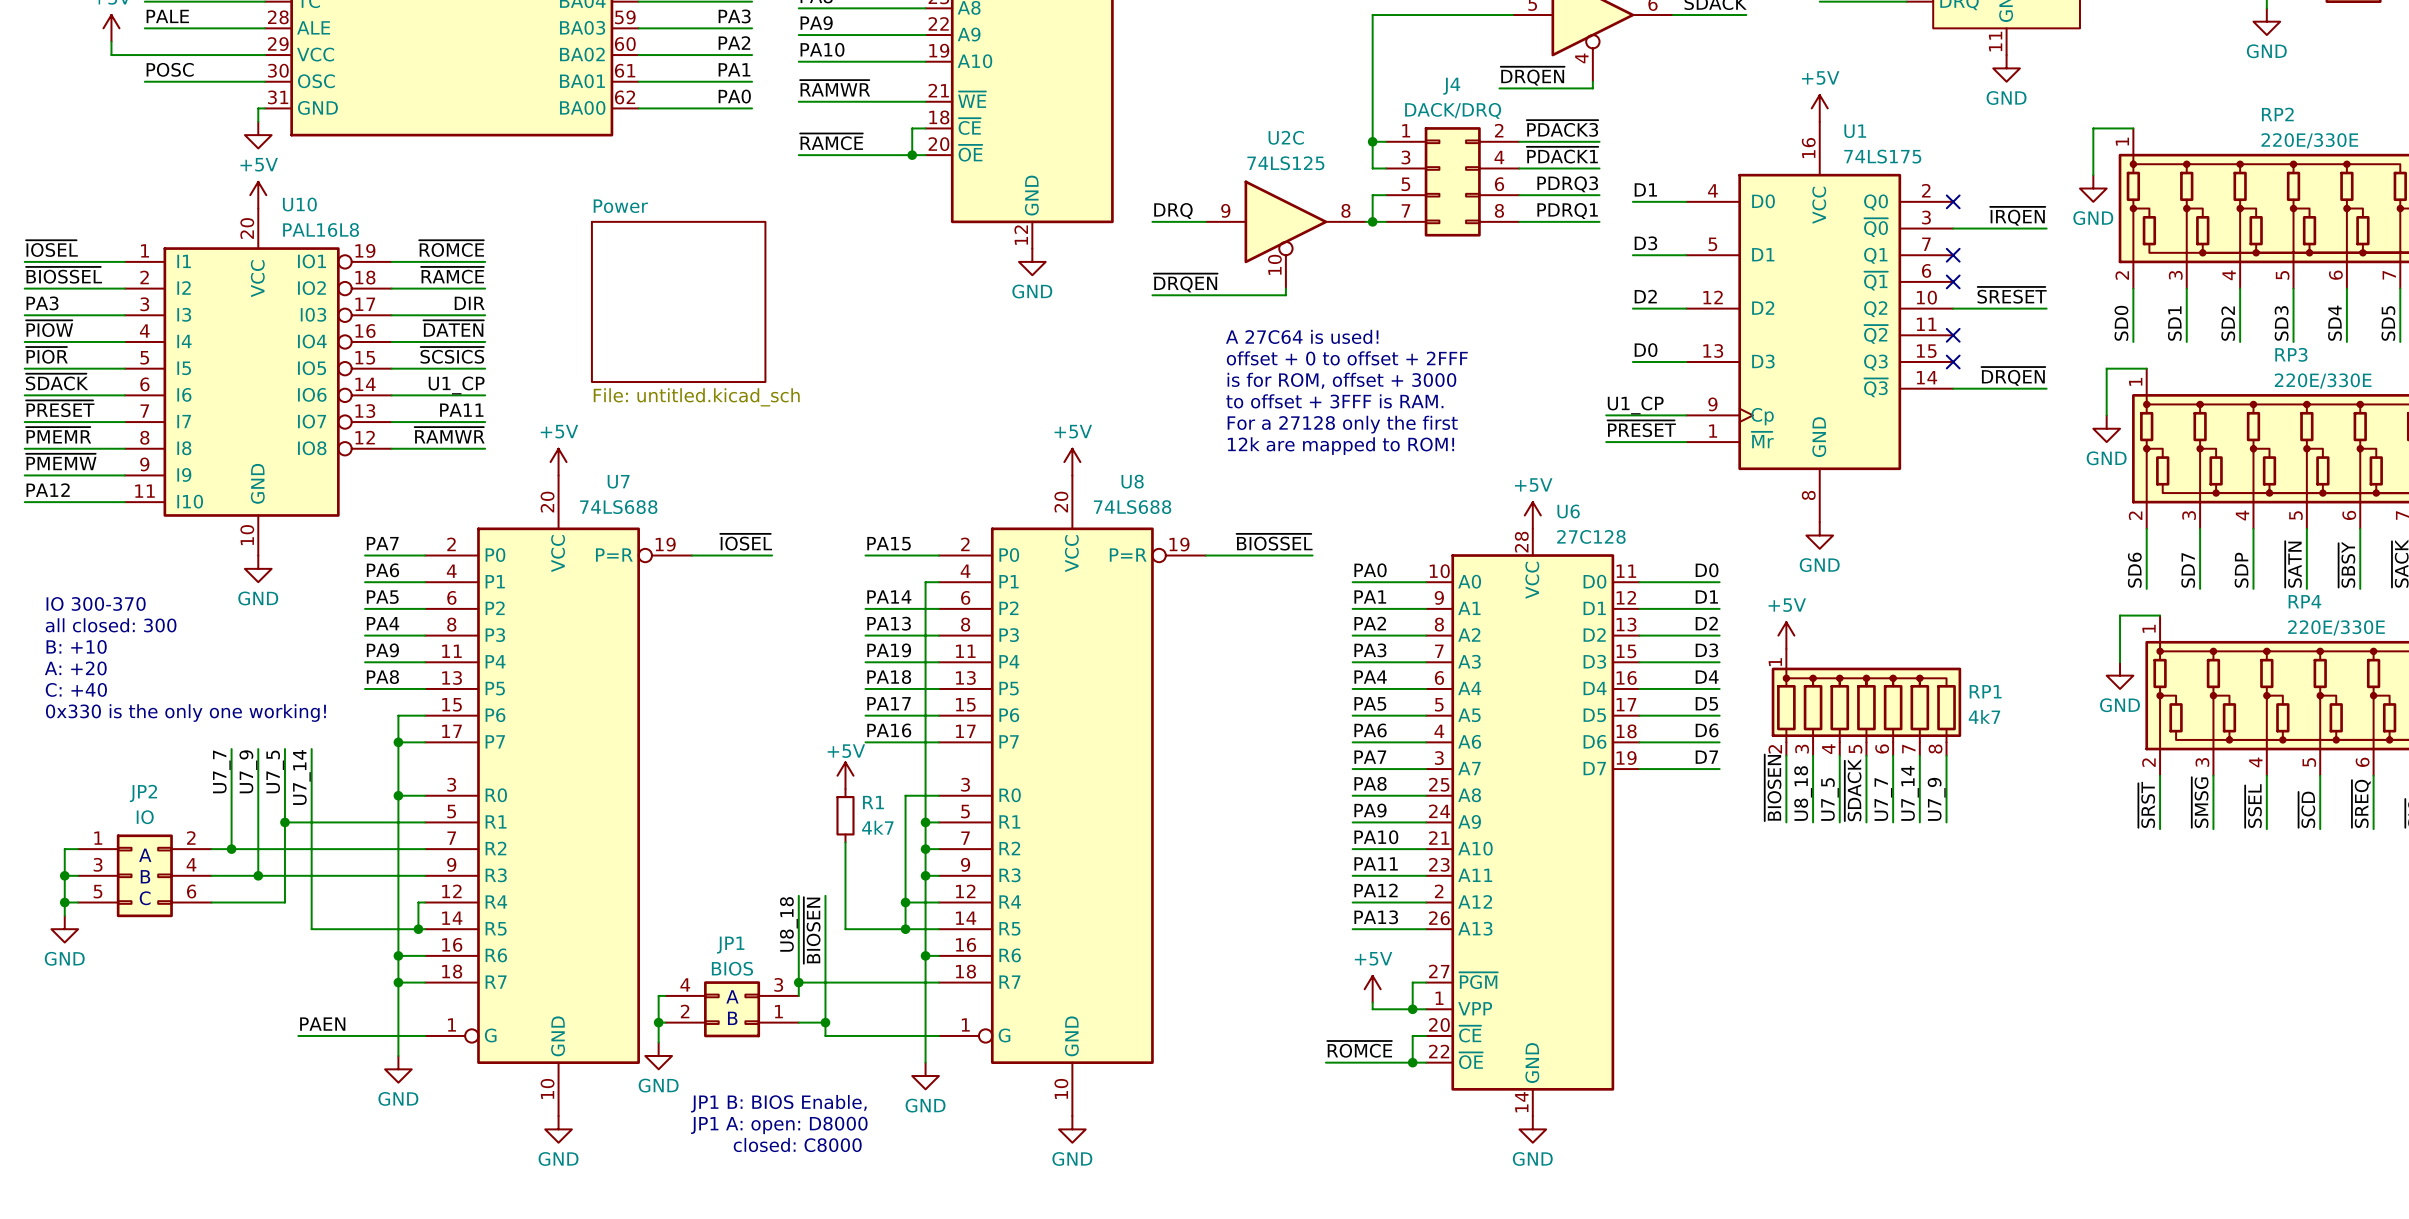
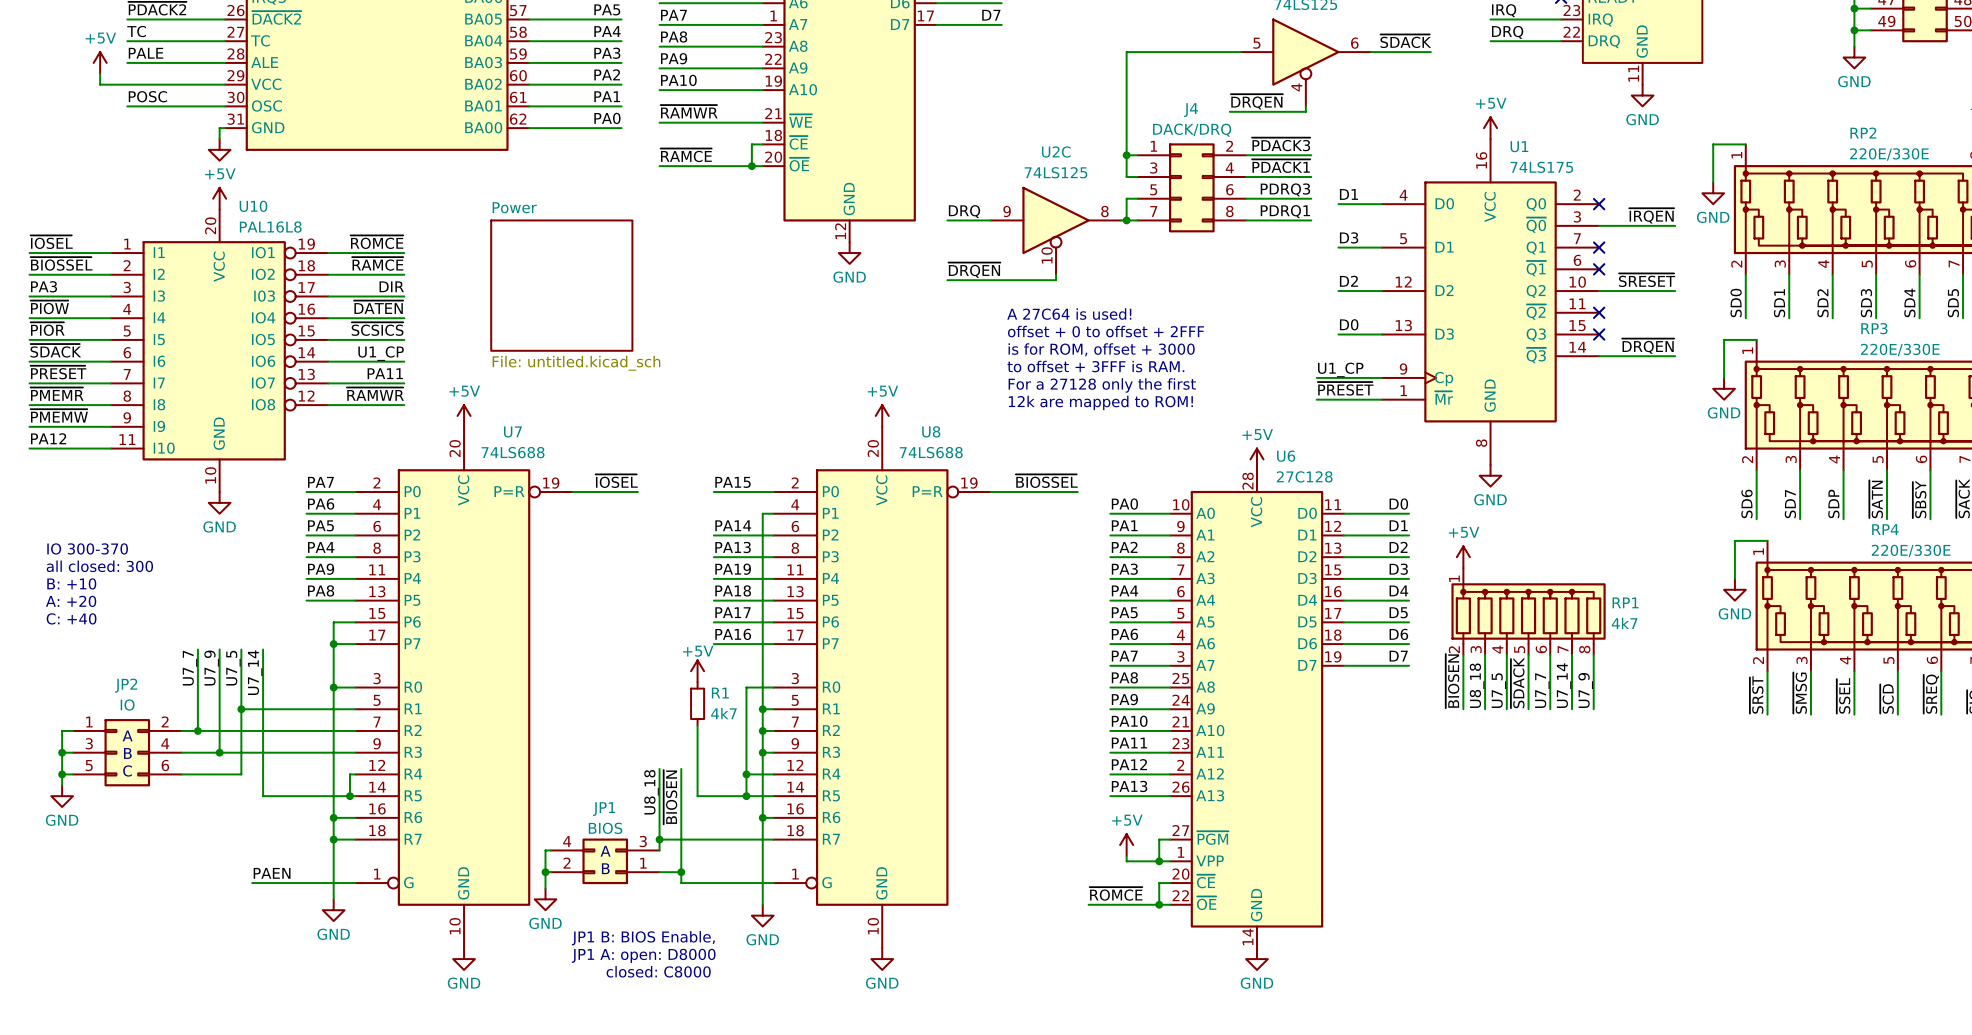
text: IO 300-370 (96, 603) -> none
text: all closed: 300 (111, 625) -> IO 300-370 (87, 548)
text: B: +10 (76, 646) -> all closed: 300 (99, 566)
text: A: +20 (75, 668) -> B: +10 (71, 583)
text: C: +40 (76, 689) -> A: +20 (71, 601)
text: 0x330 is the only one working! (185, 713) -> C: +40 (71, 618)

